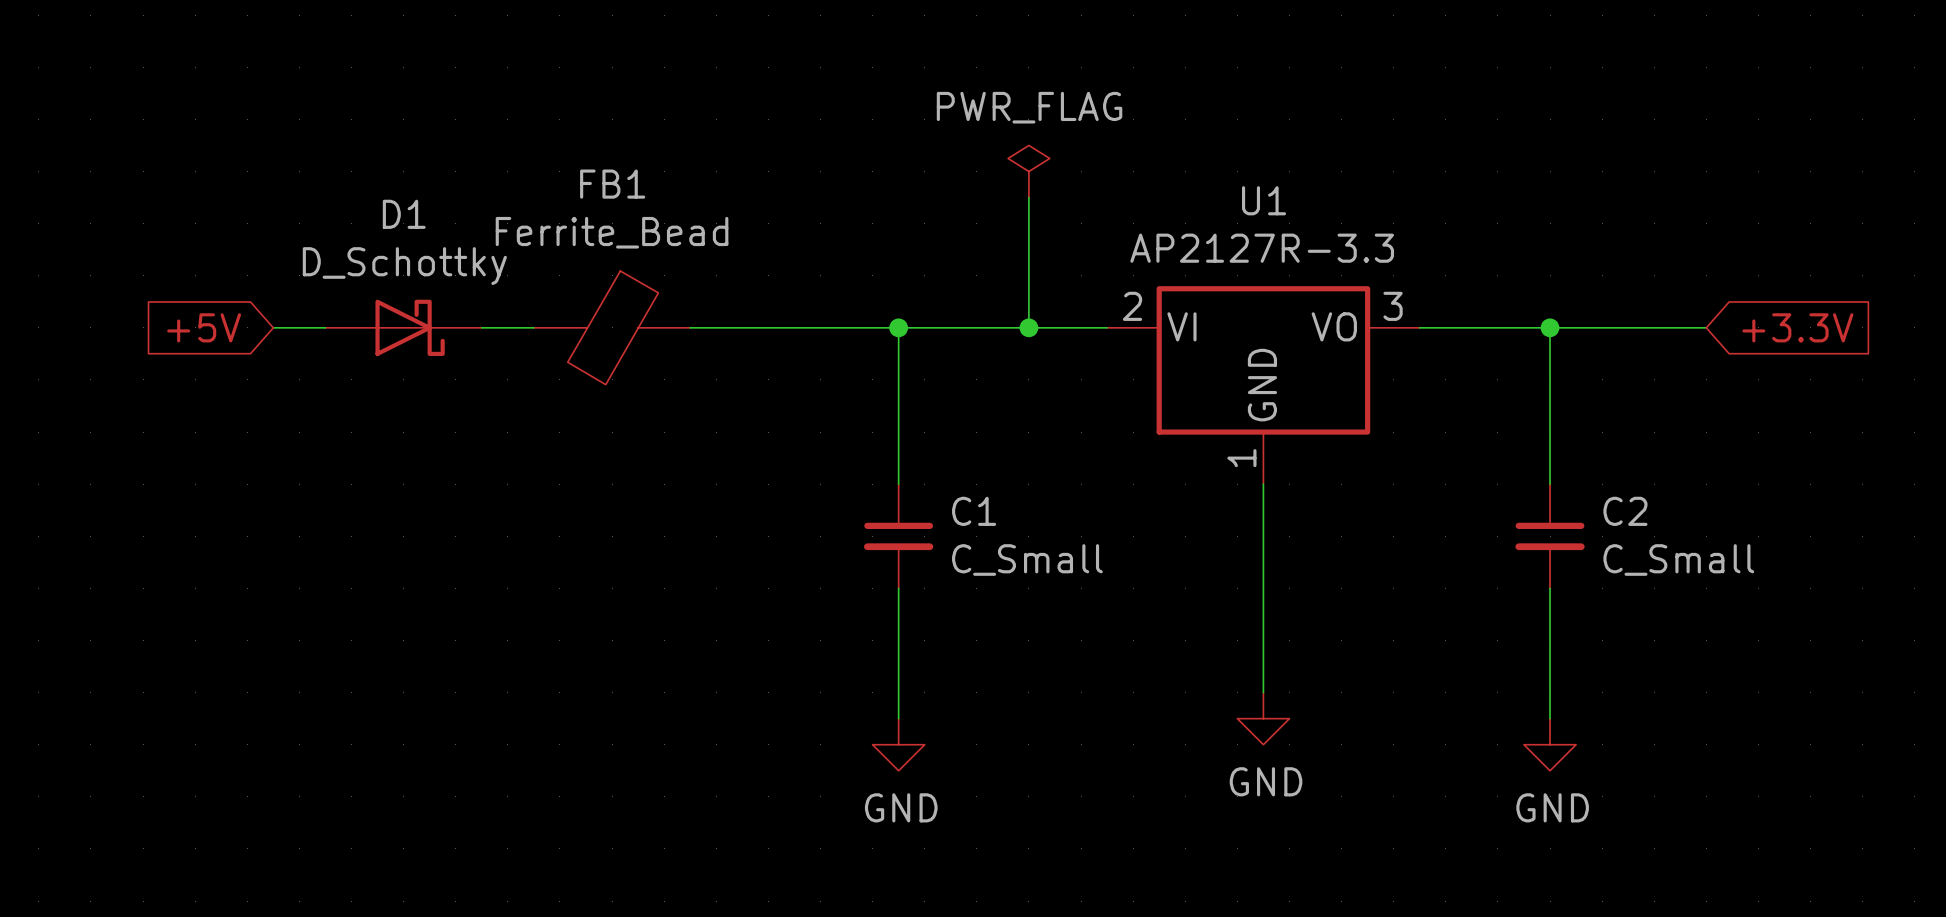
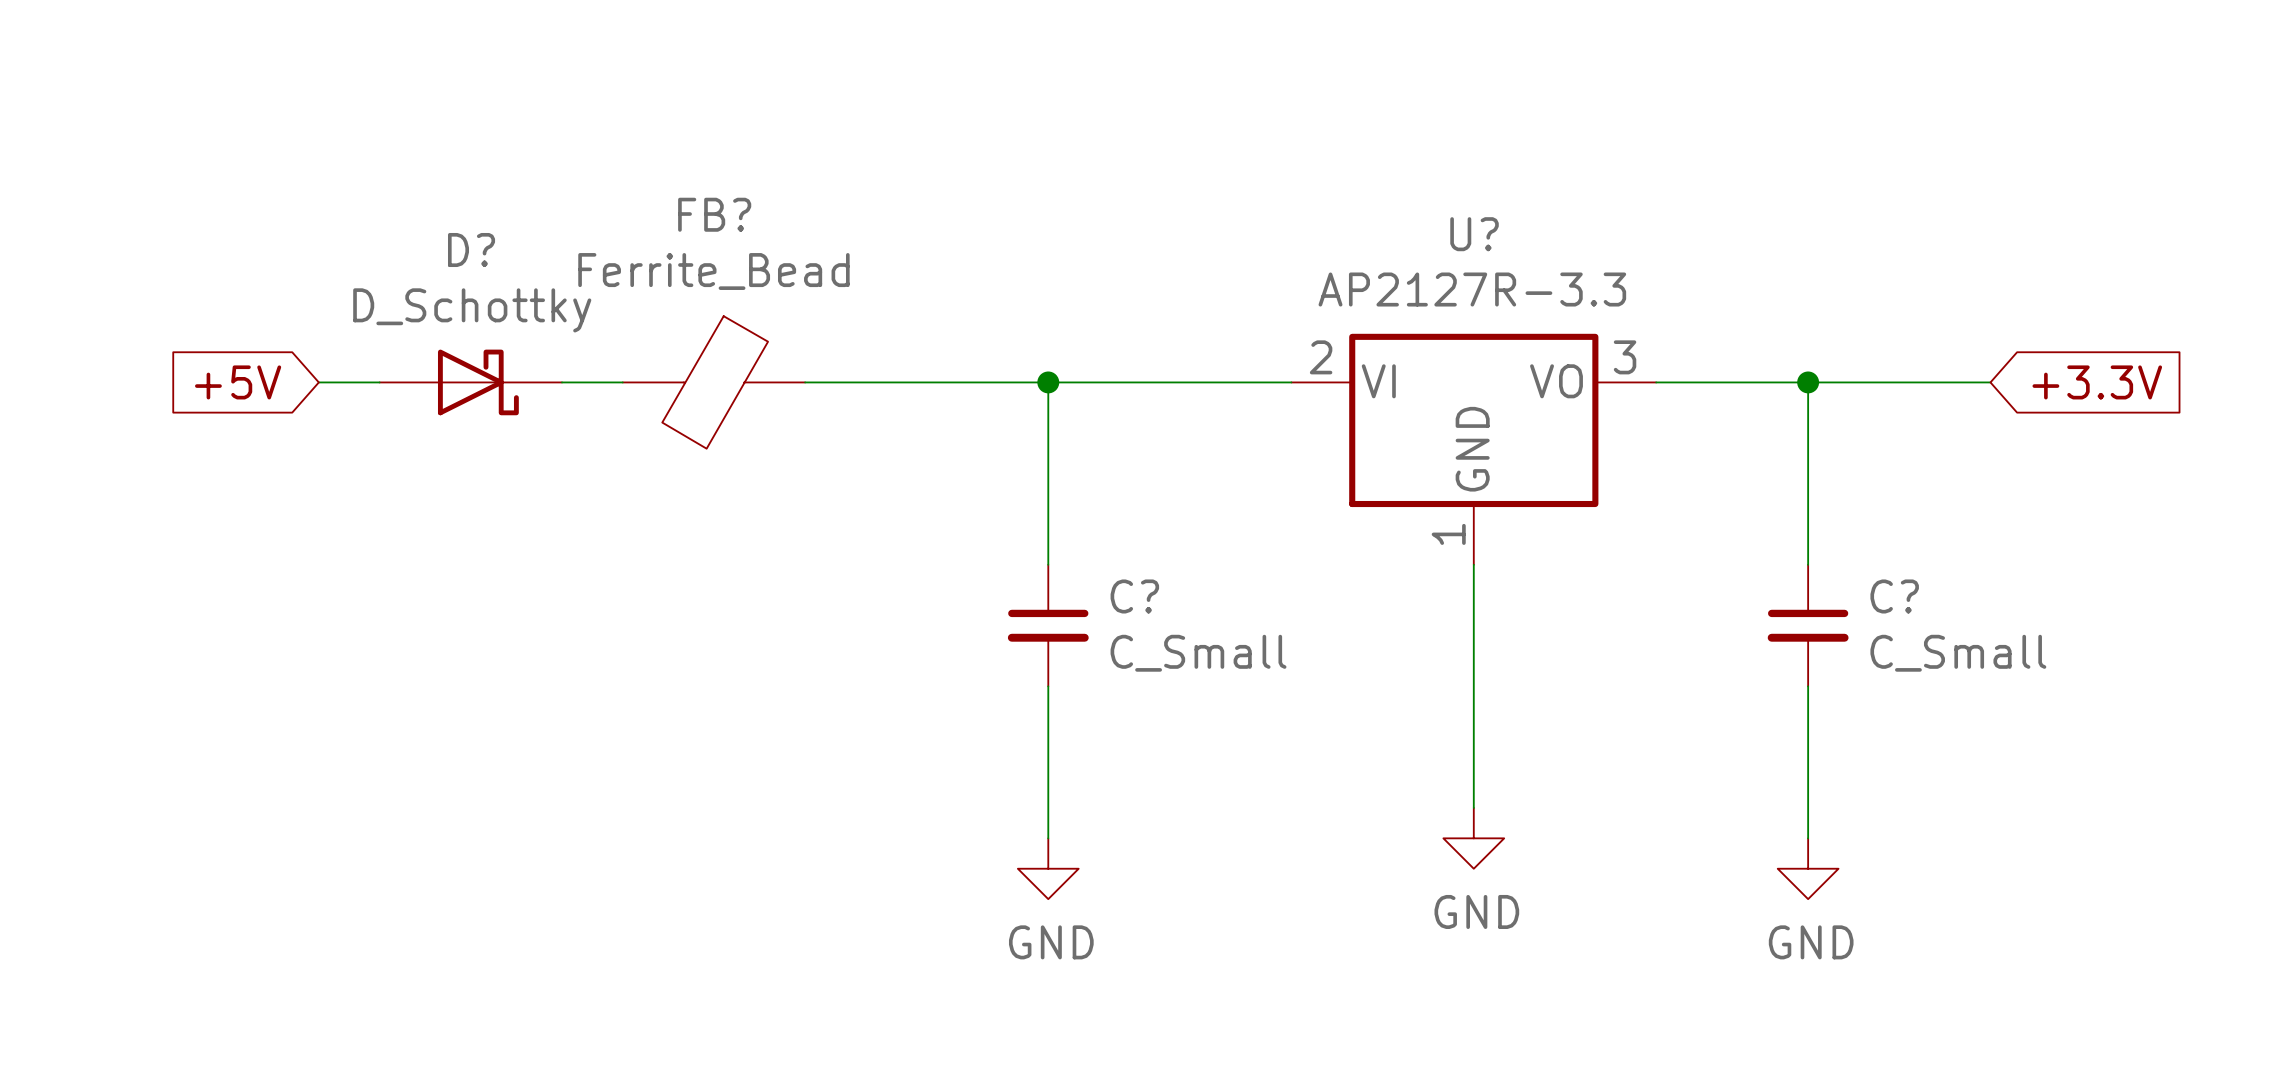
power symbol: PWR_FLAG (1028, 171) -> none
FB1 name: FB1 (612, 184) -> FB? (714, 214)
wire: (1028, 197) (1028, 327) -> none
U1 name: U1 (1264, 200) -> U? (1474, 234)
D1 name: D1 (404, 214) -> D? (471, 250)
junction: (1028, 327) -> none
C1 name: C1 (974, 511) -> C? (1134, 596)
C2 name: C2 (1625, 511) -> C? (1894, 596)

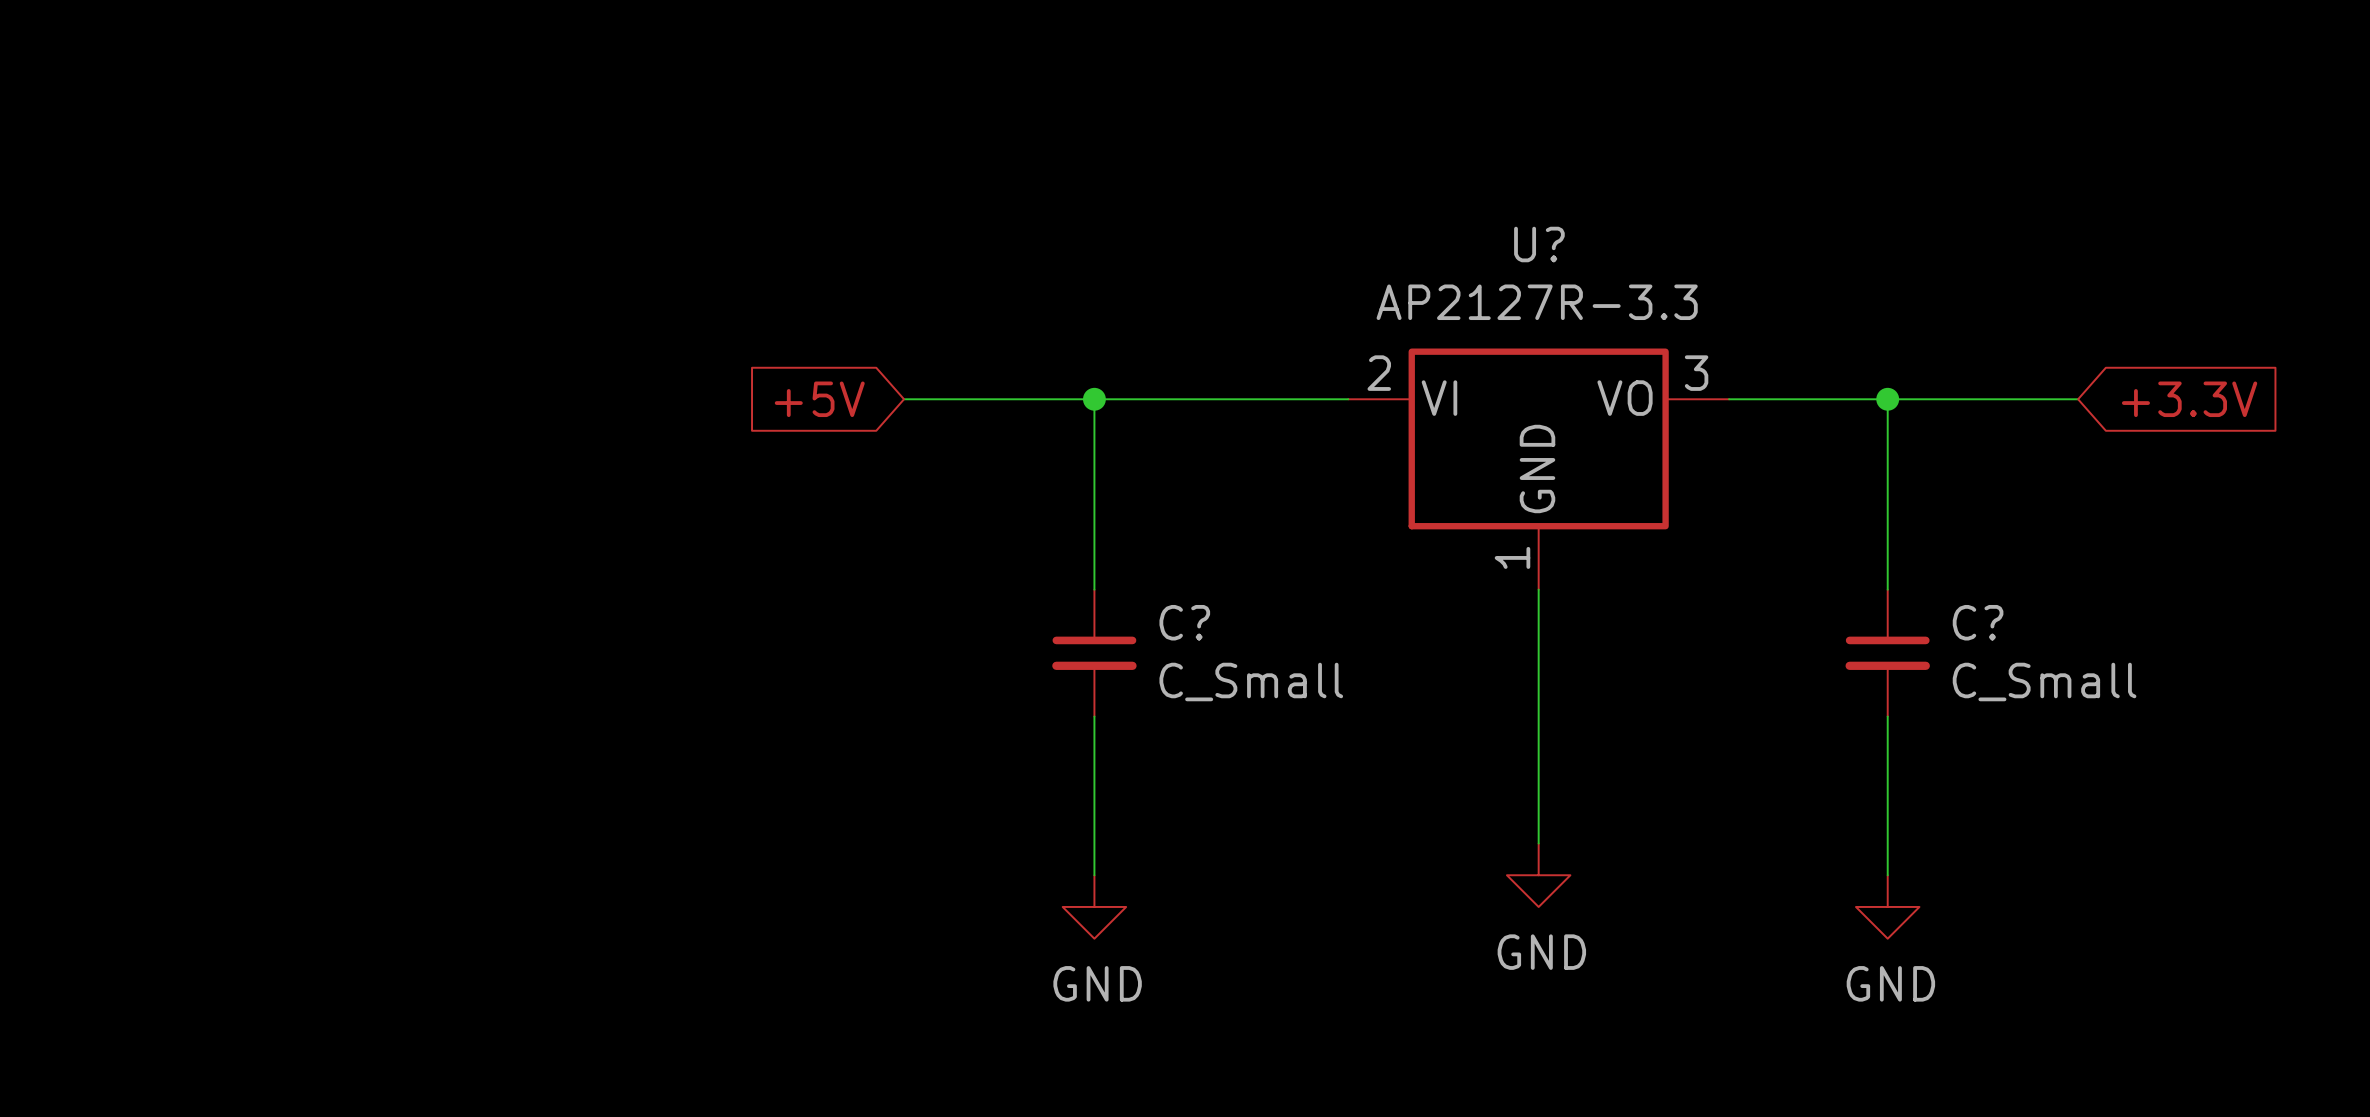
global label position: +5V (238, 382) -> +5V (819, 399)
wire: (318, 382) (379, 382) -> none
D?: D_Schottky (470, 382) -> none
wire: (561, 382) (622, 382) -> none
FB?: Ferrite_Bead (713, 382) -> none
wire: (805, 382) (865, 382) -> none

